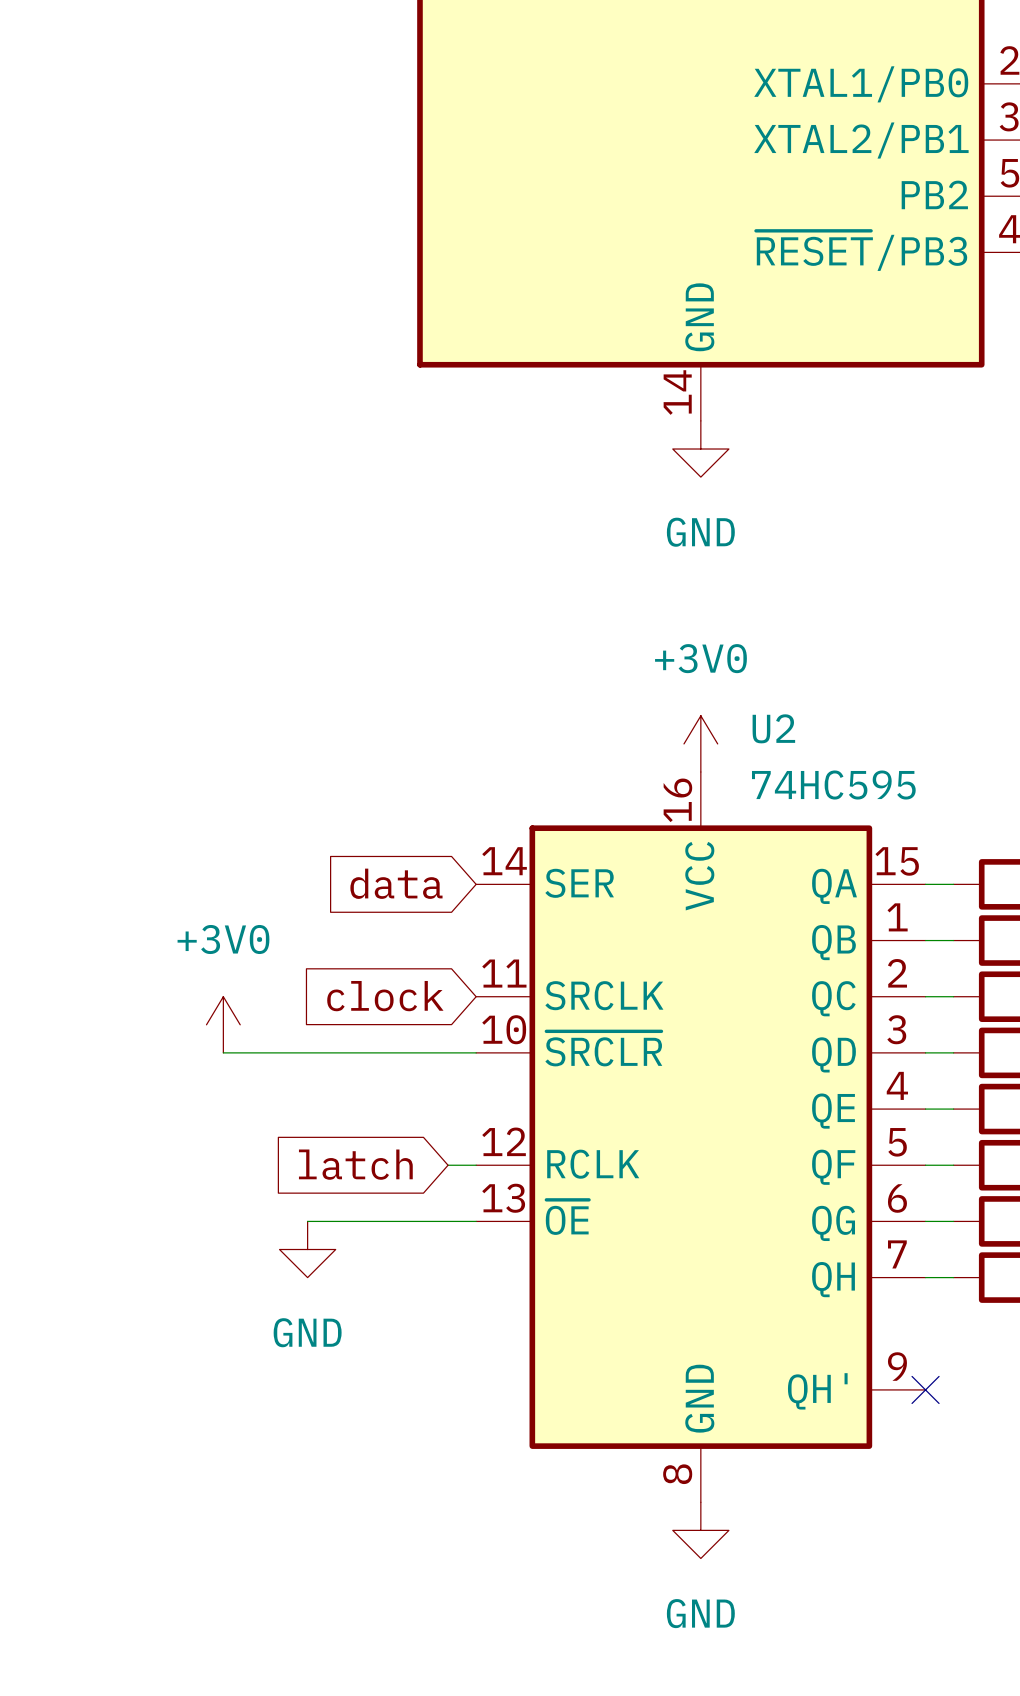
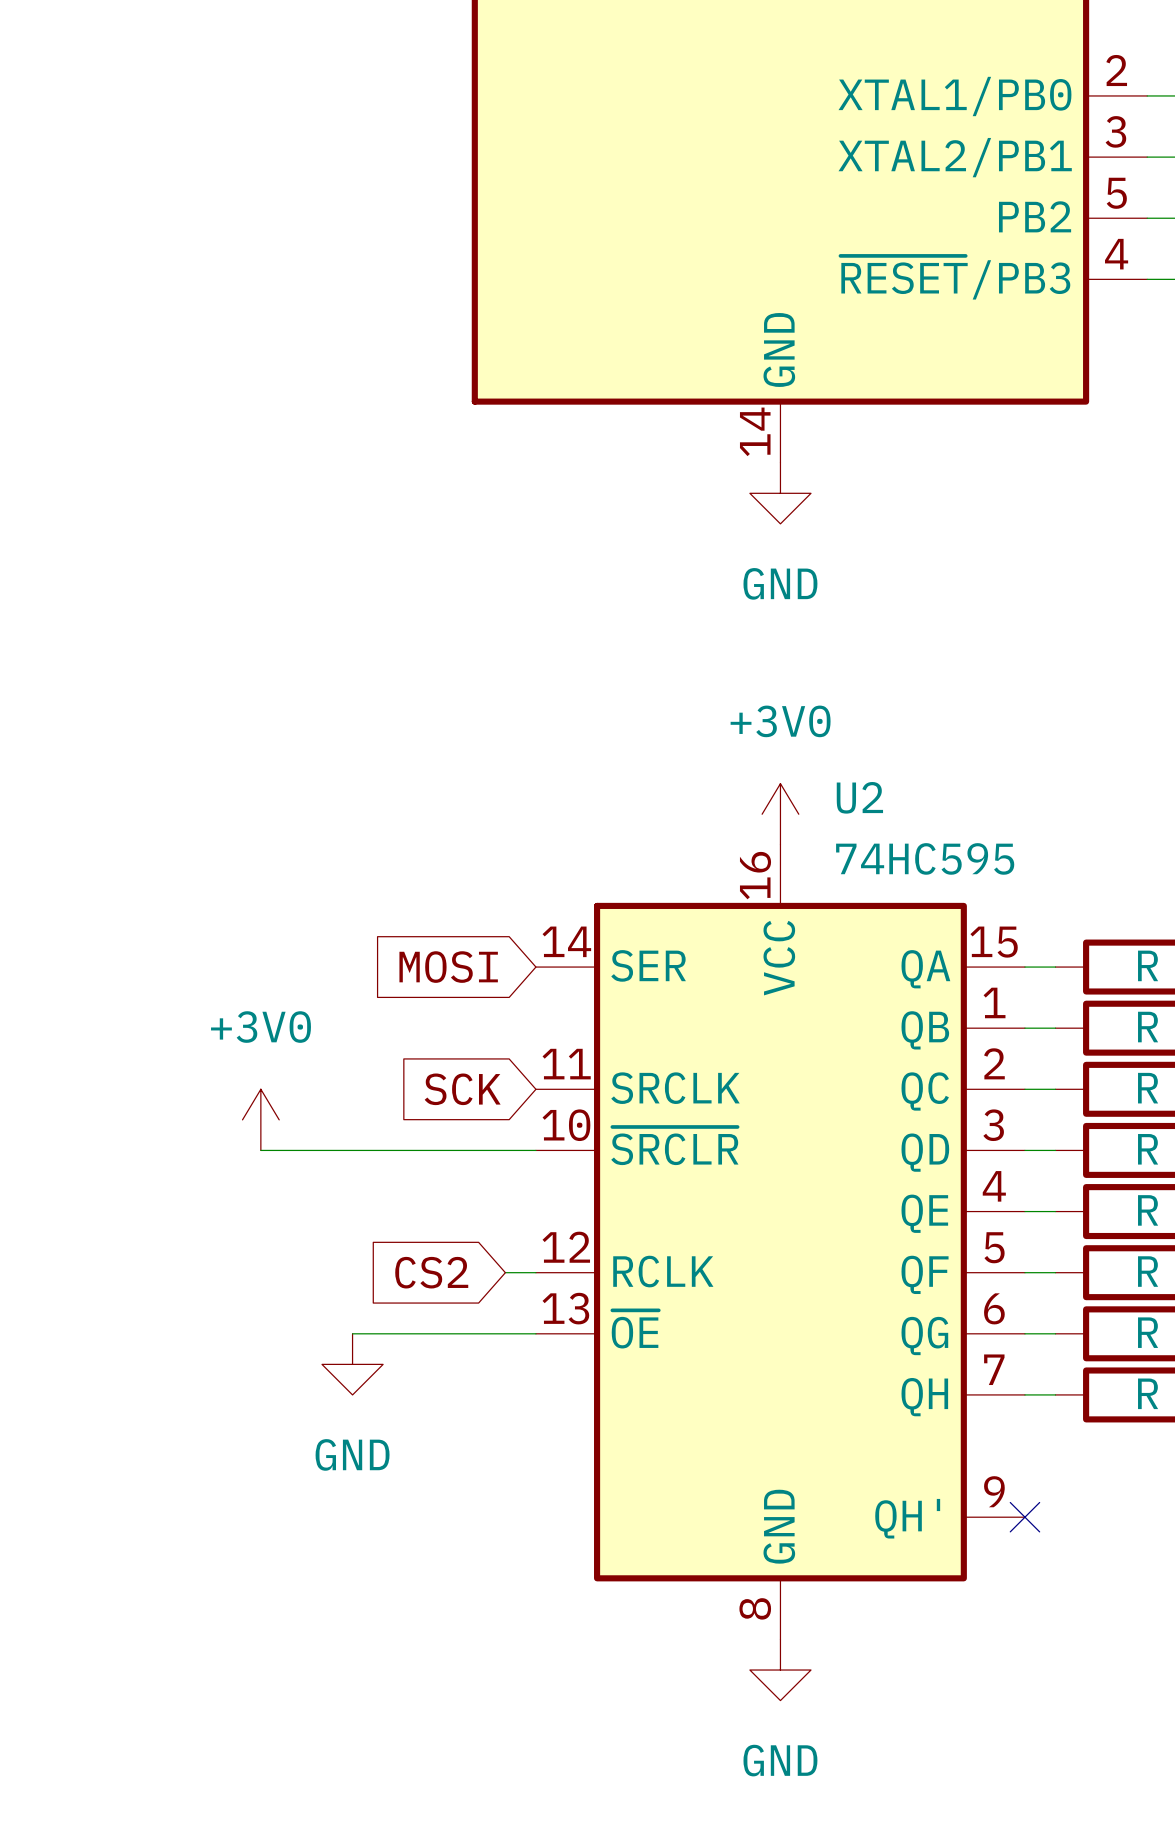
global label: data (396, 883) -> MOSI (448, 967)
global label: clock (385, 996) -> SCK (462, 1089)
global label: latch (355, 1164) -> CS2 (431, 1272)

